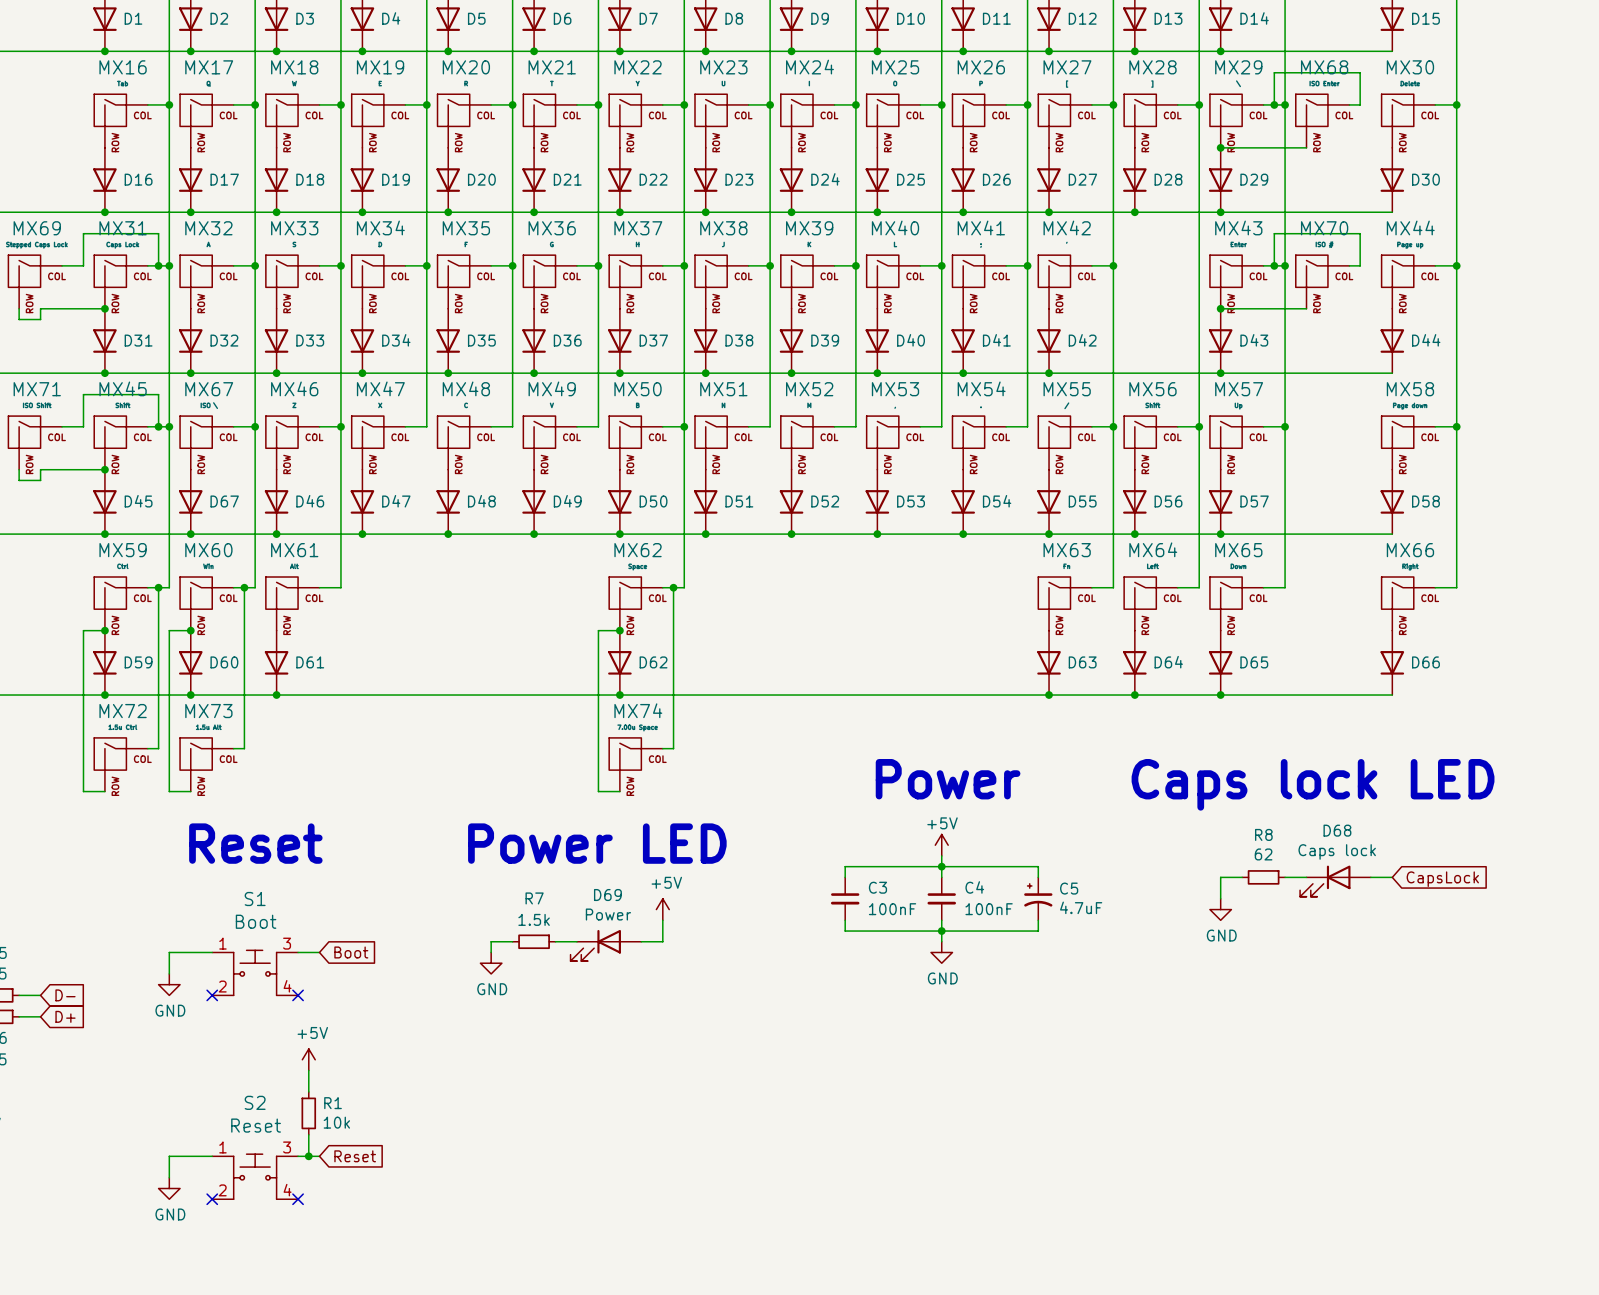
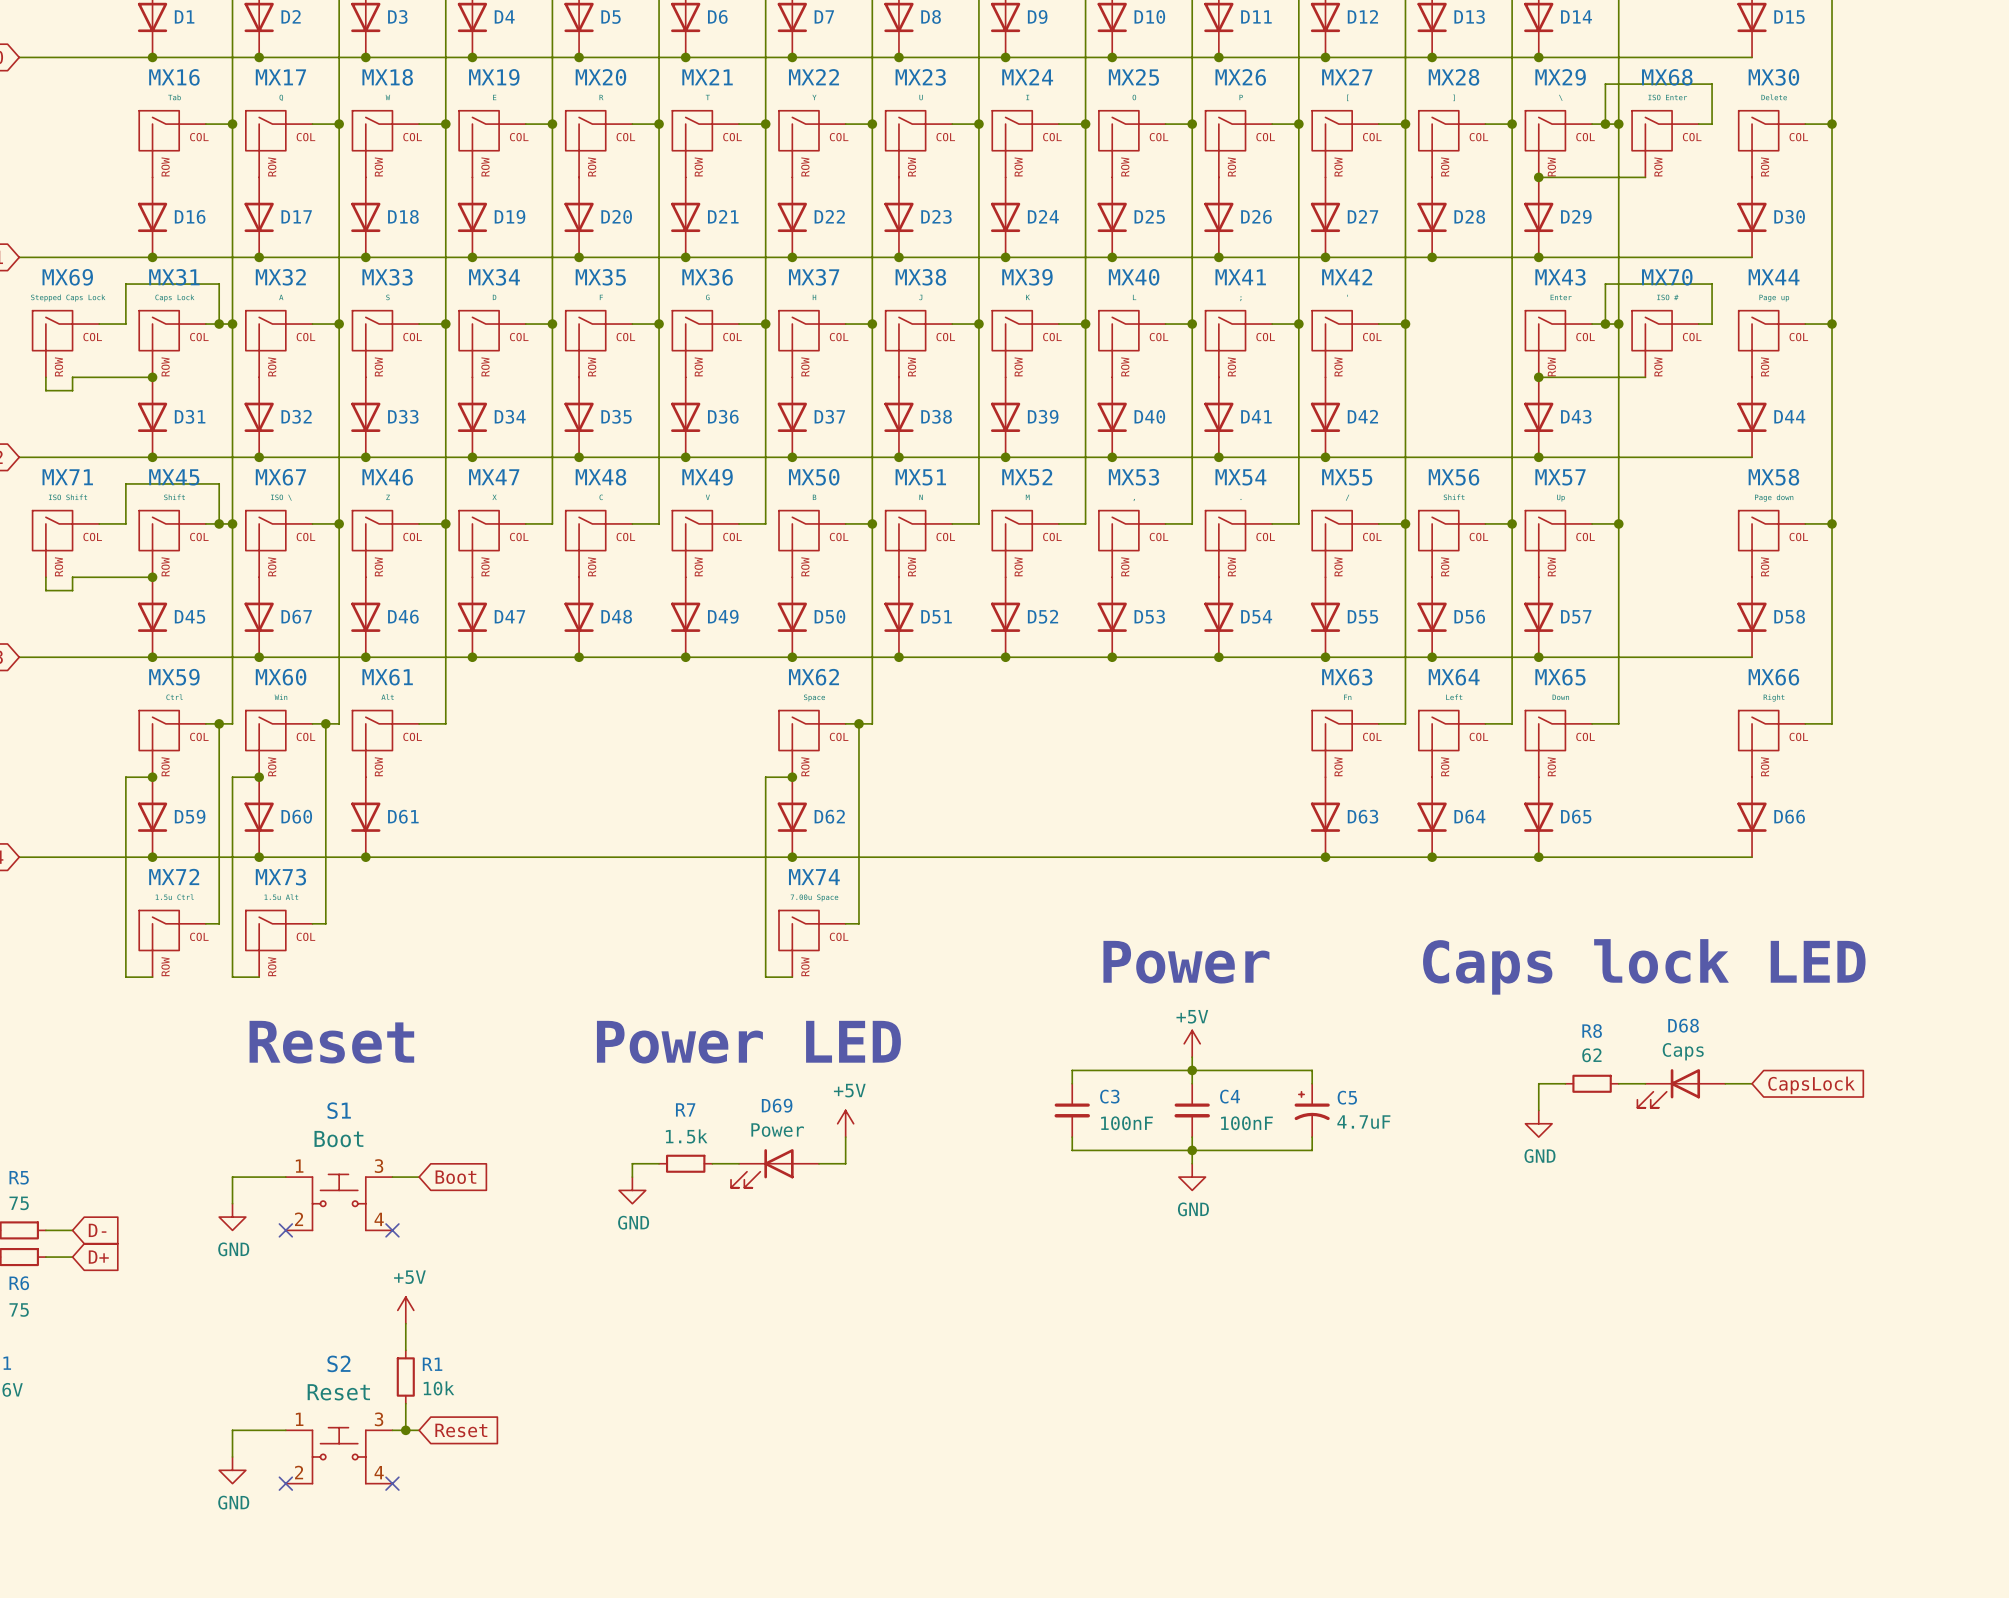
D68 value: Caps lock (1337, 851) -> Caps (1683, 1051)

